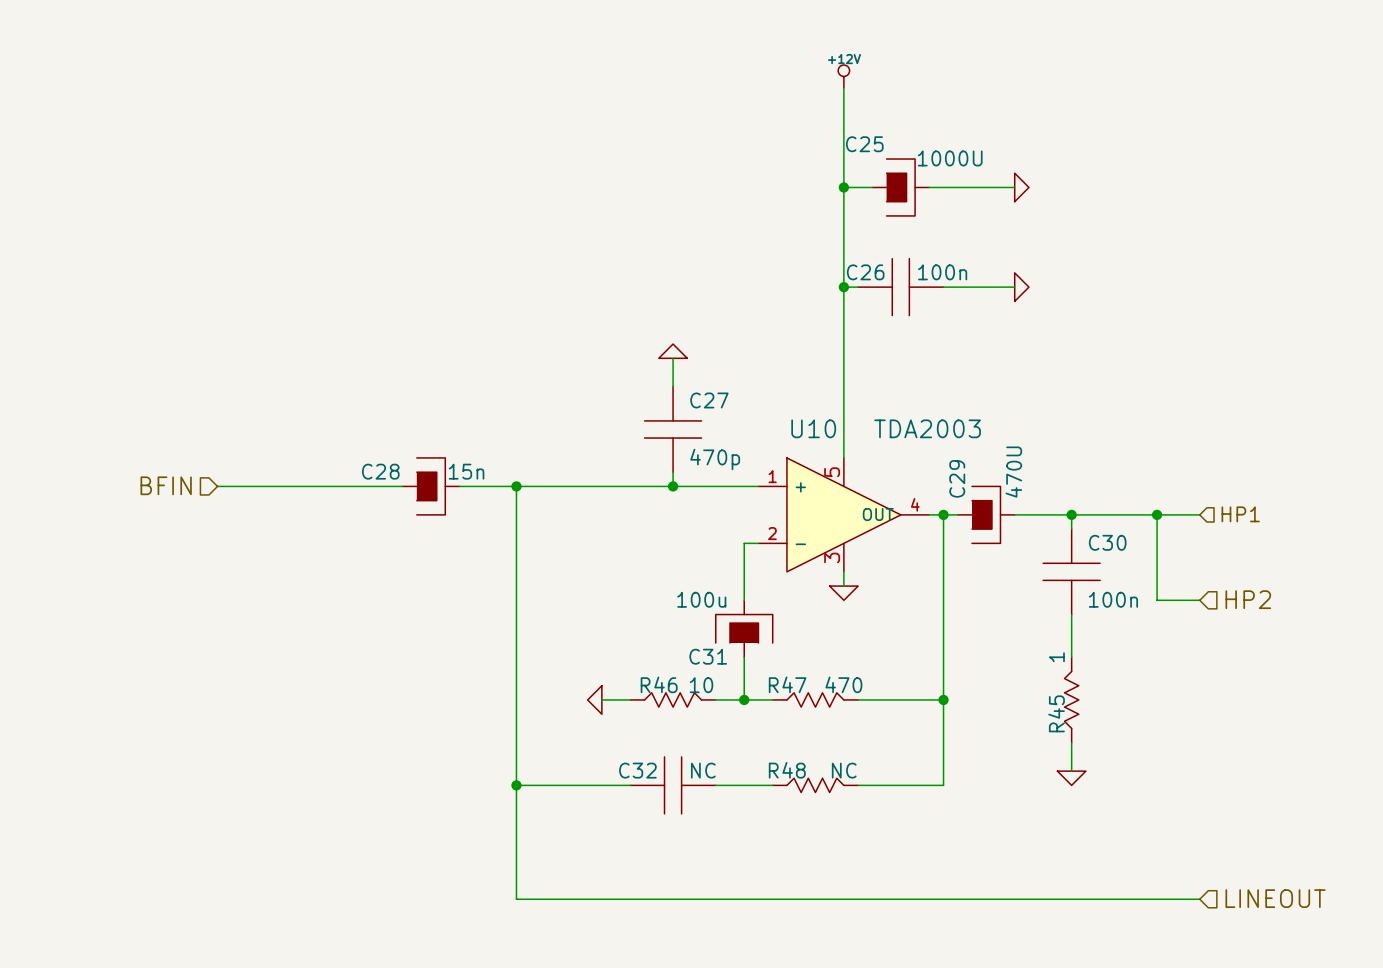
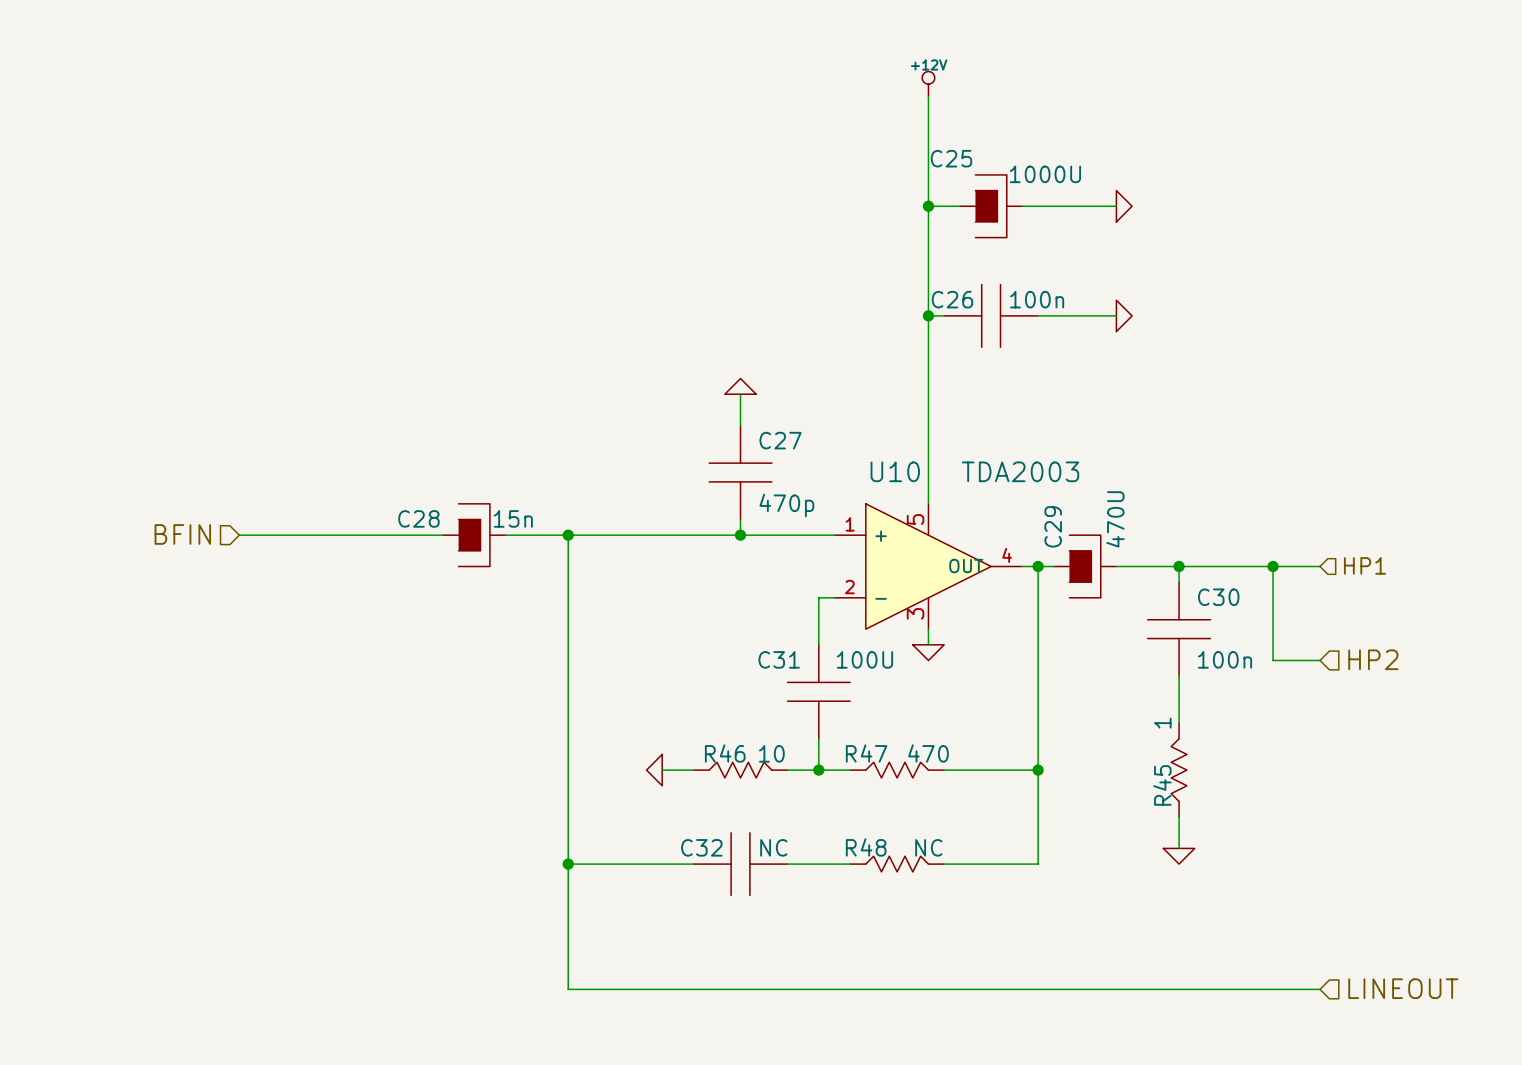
C31 value: 100u (701, 599) -> 100U (864, 659)
C31 symbol: [715, 600, 773, 658] -> [787, 644, 851, 739]
C31 name position: C31 (708, 656) -> C31 (779, 659)

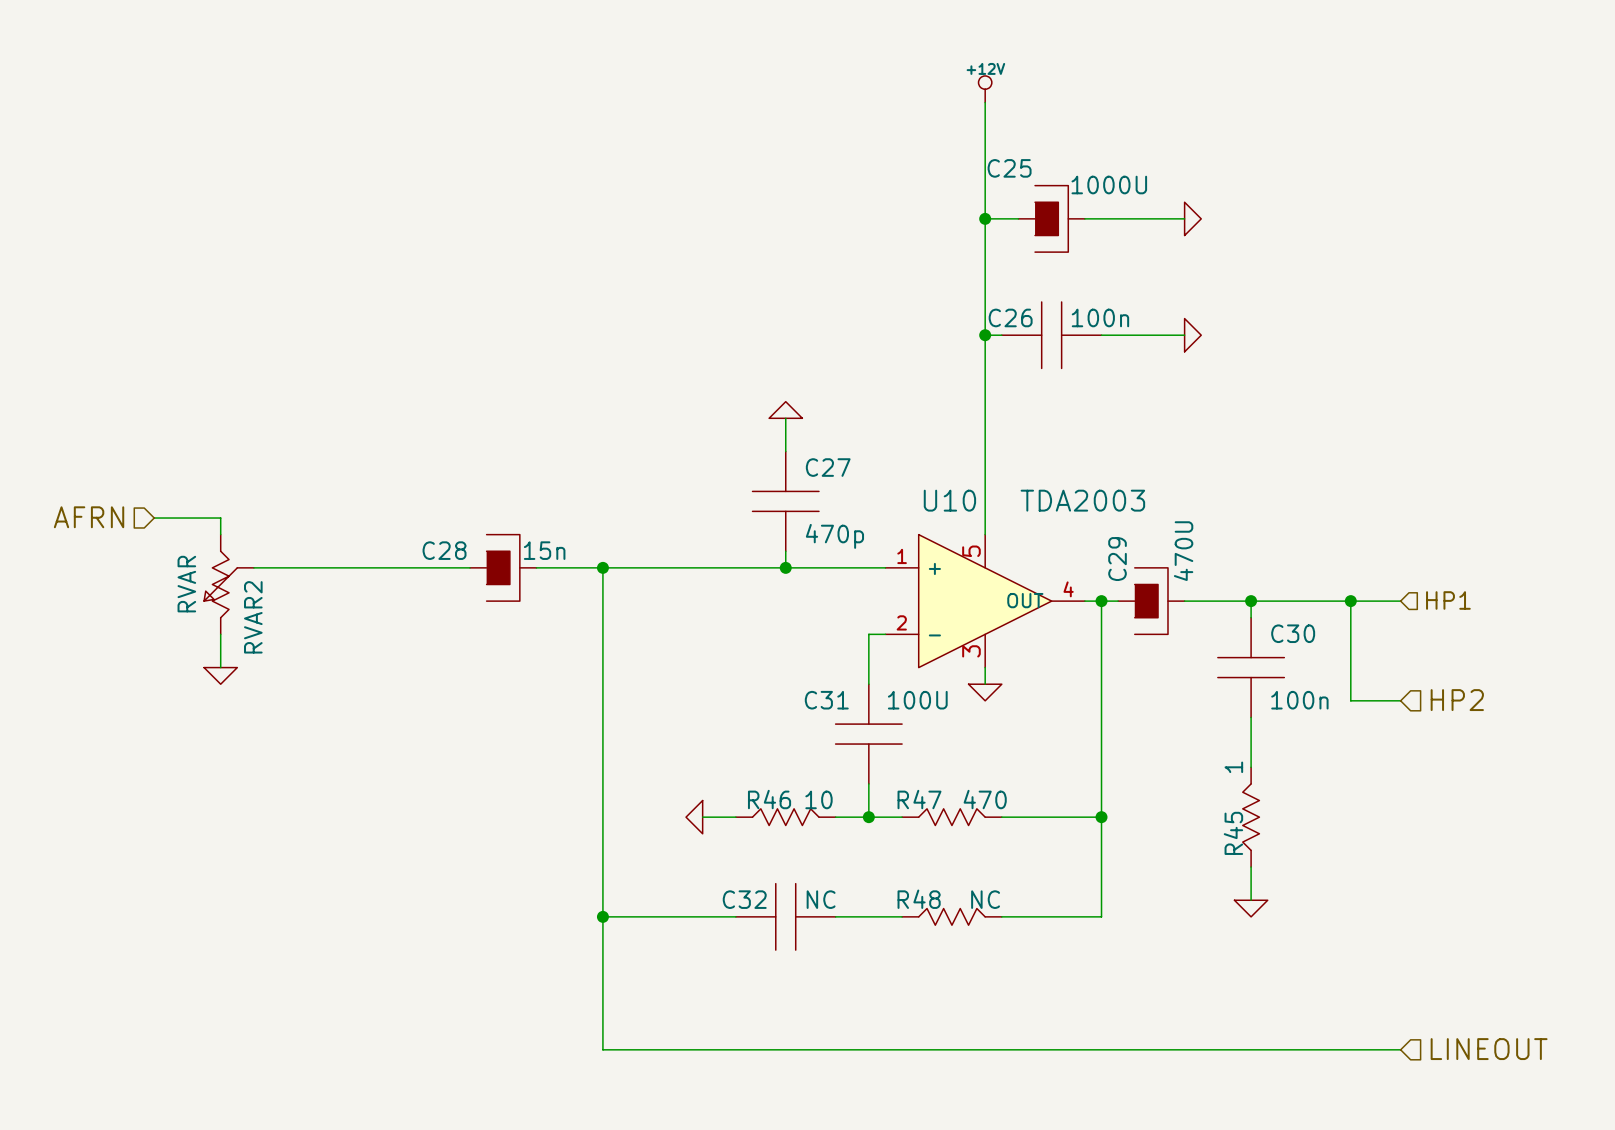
hierarchical label: none -> AFRN (89, 517)
wire: none -> (154, 518) (220, 518) (220, 534)
hierarchical label: BFIN (182, 534) -> none
RVAR2: none -> RVAR (229, 584)
wire: none -> (220, 634) (220, 667)
power symbol: none -> (220, 675)

